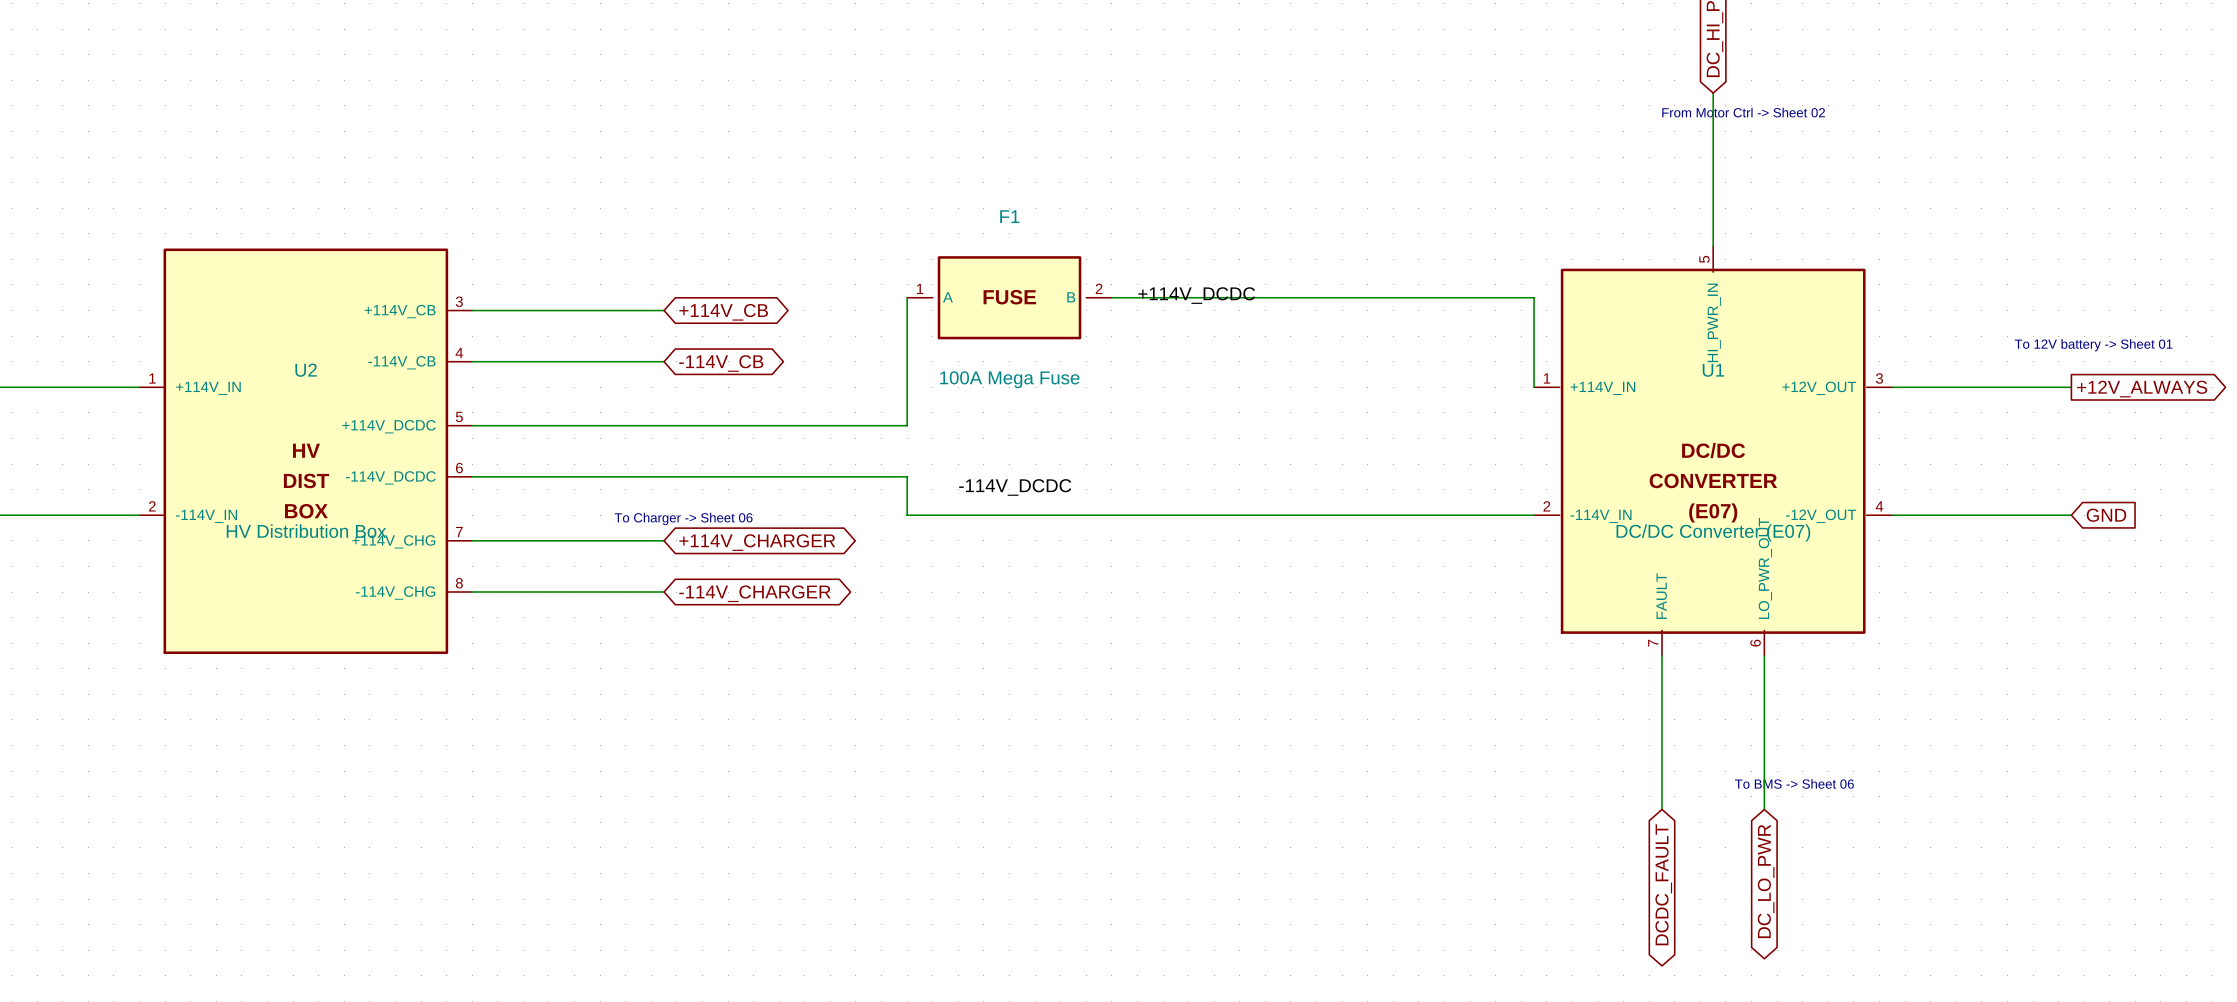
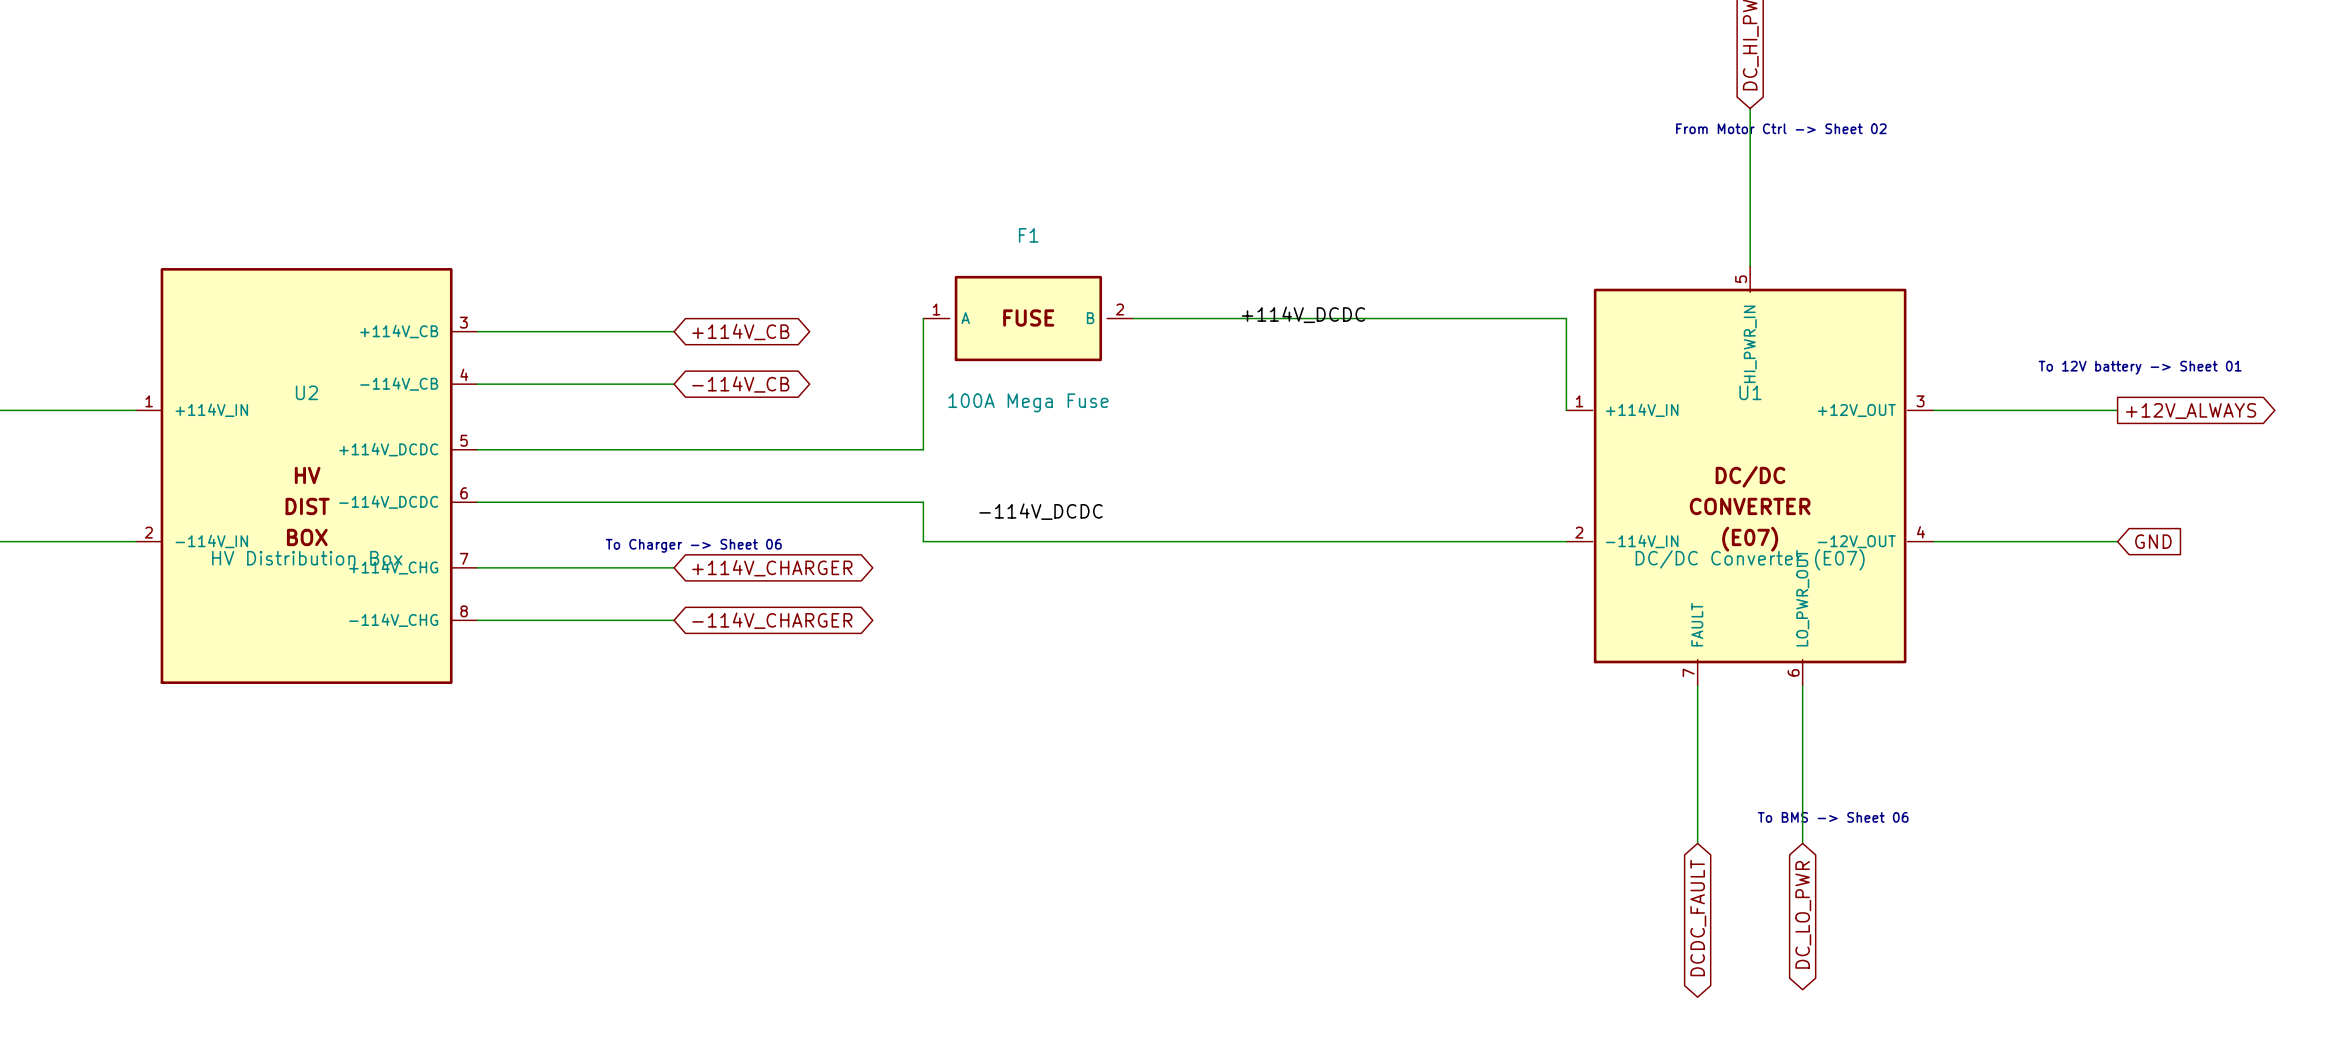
label position: +114V_DCDC (1196, 295) -> +114V_DCDC (1303, 314)

